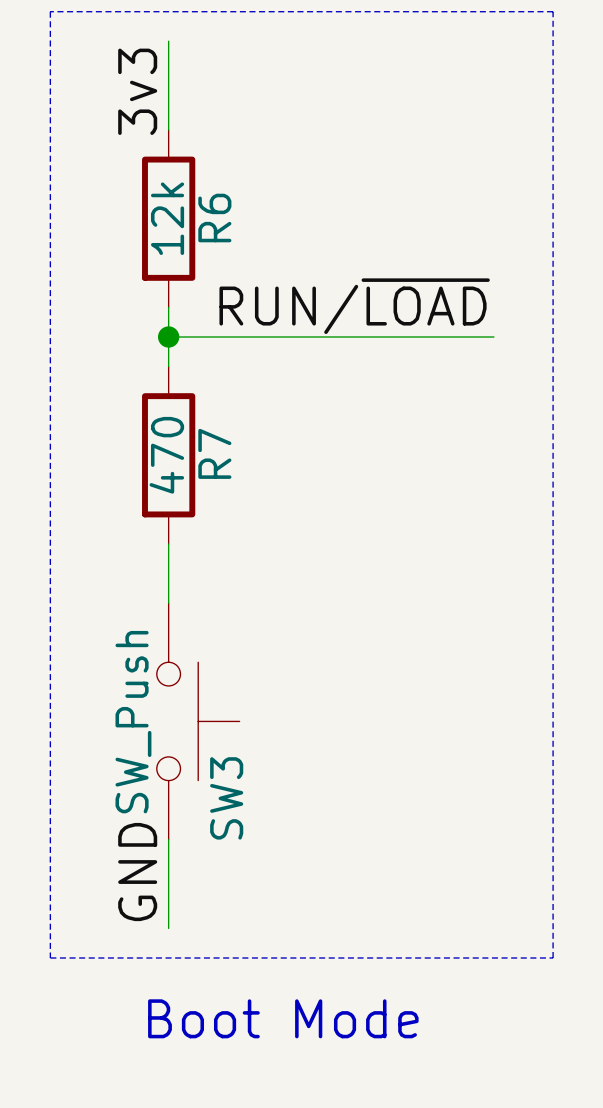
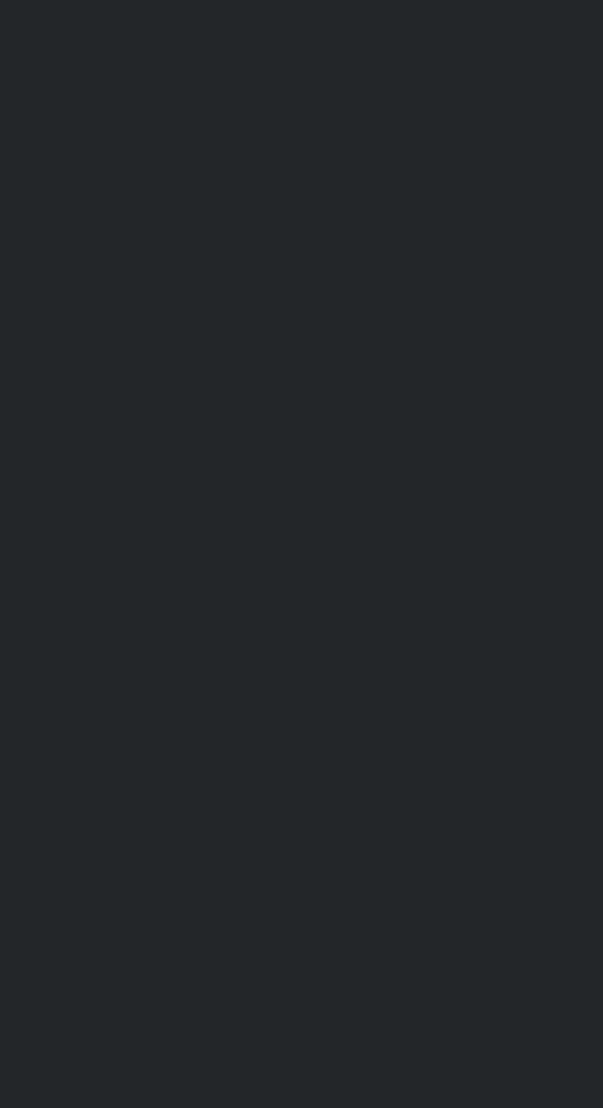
line: (50, 11) (50, 958) (553, 958) (553, 11) (50, 11) -> none
wire: (168, 41) (168, 129) -> none
label: 3v3 (137, 91) -> none
R6: 12k (168, 218) -> none
label: RUN/~{LOAD} (354, 306) -> none
wire: (168, 307) (168, 366) -> none
wire: (168, 337) (493, 337) -> none
junction: (168, 337) -> none
R7: 470 (168, 455) -> none
wire: (168, 544) (168, 603) -> none
SW3: SW_Push (198, 721) -> none
wire: (168, 839) (168, 928) -> none
label: GND (137, 872) -> none
text: Boot Mode (283, 1018) -> none

